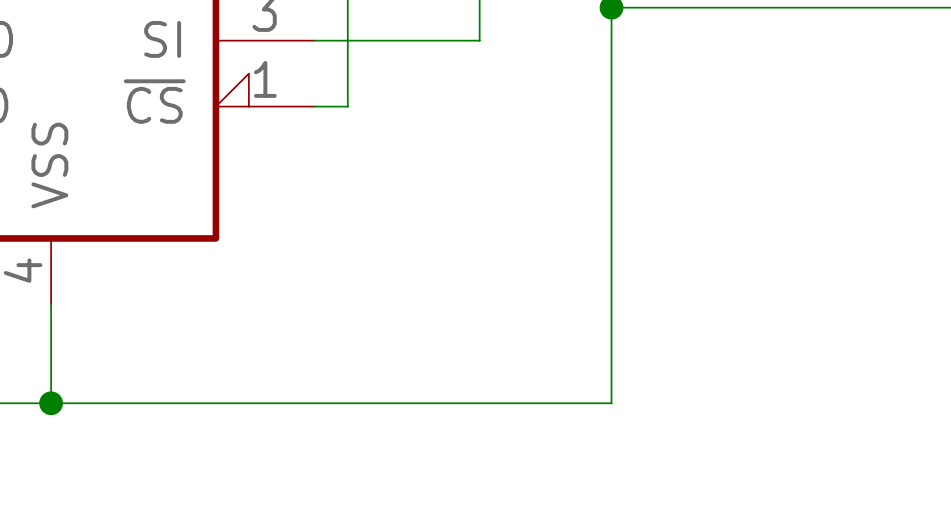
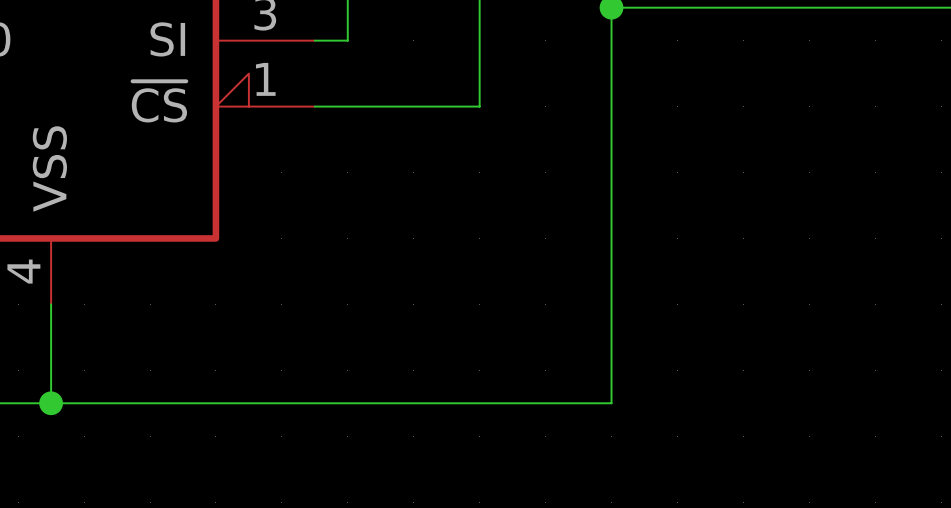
wire: (479, 40) (347, 40) (347, 106) -> (479, 40) (479, 106) (347, 106)

